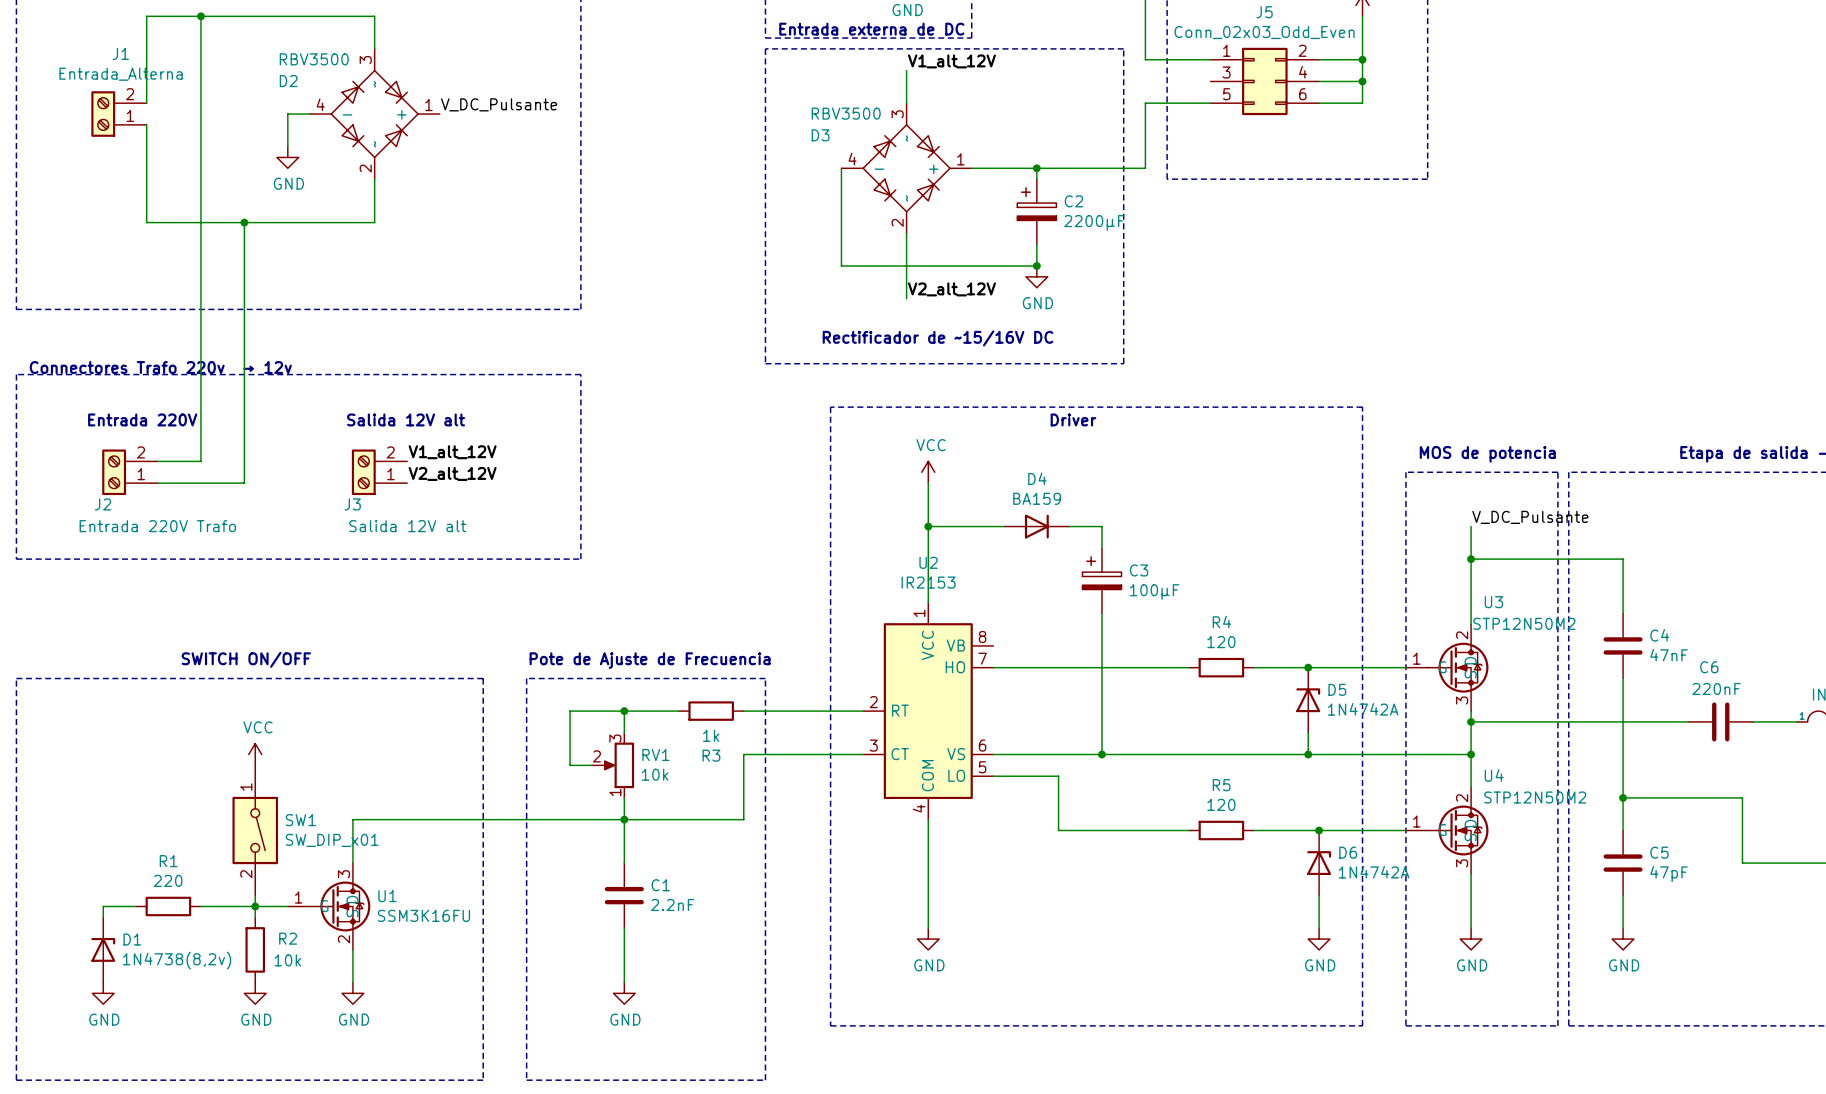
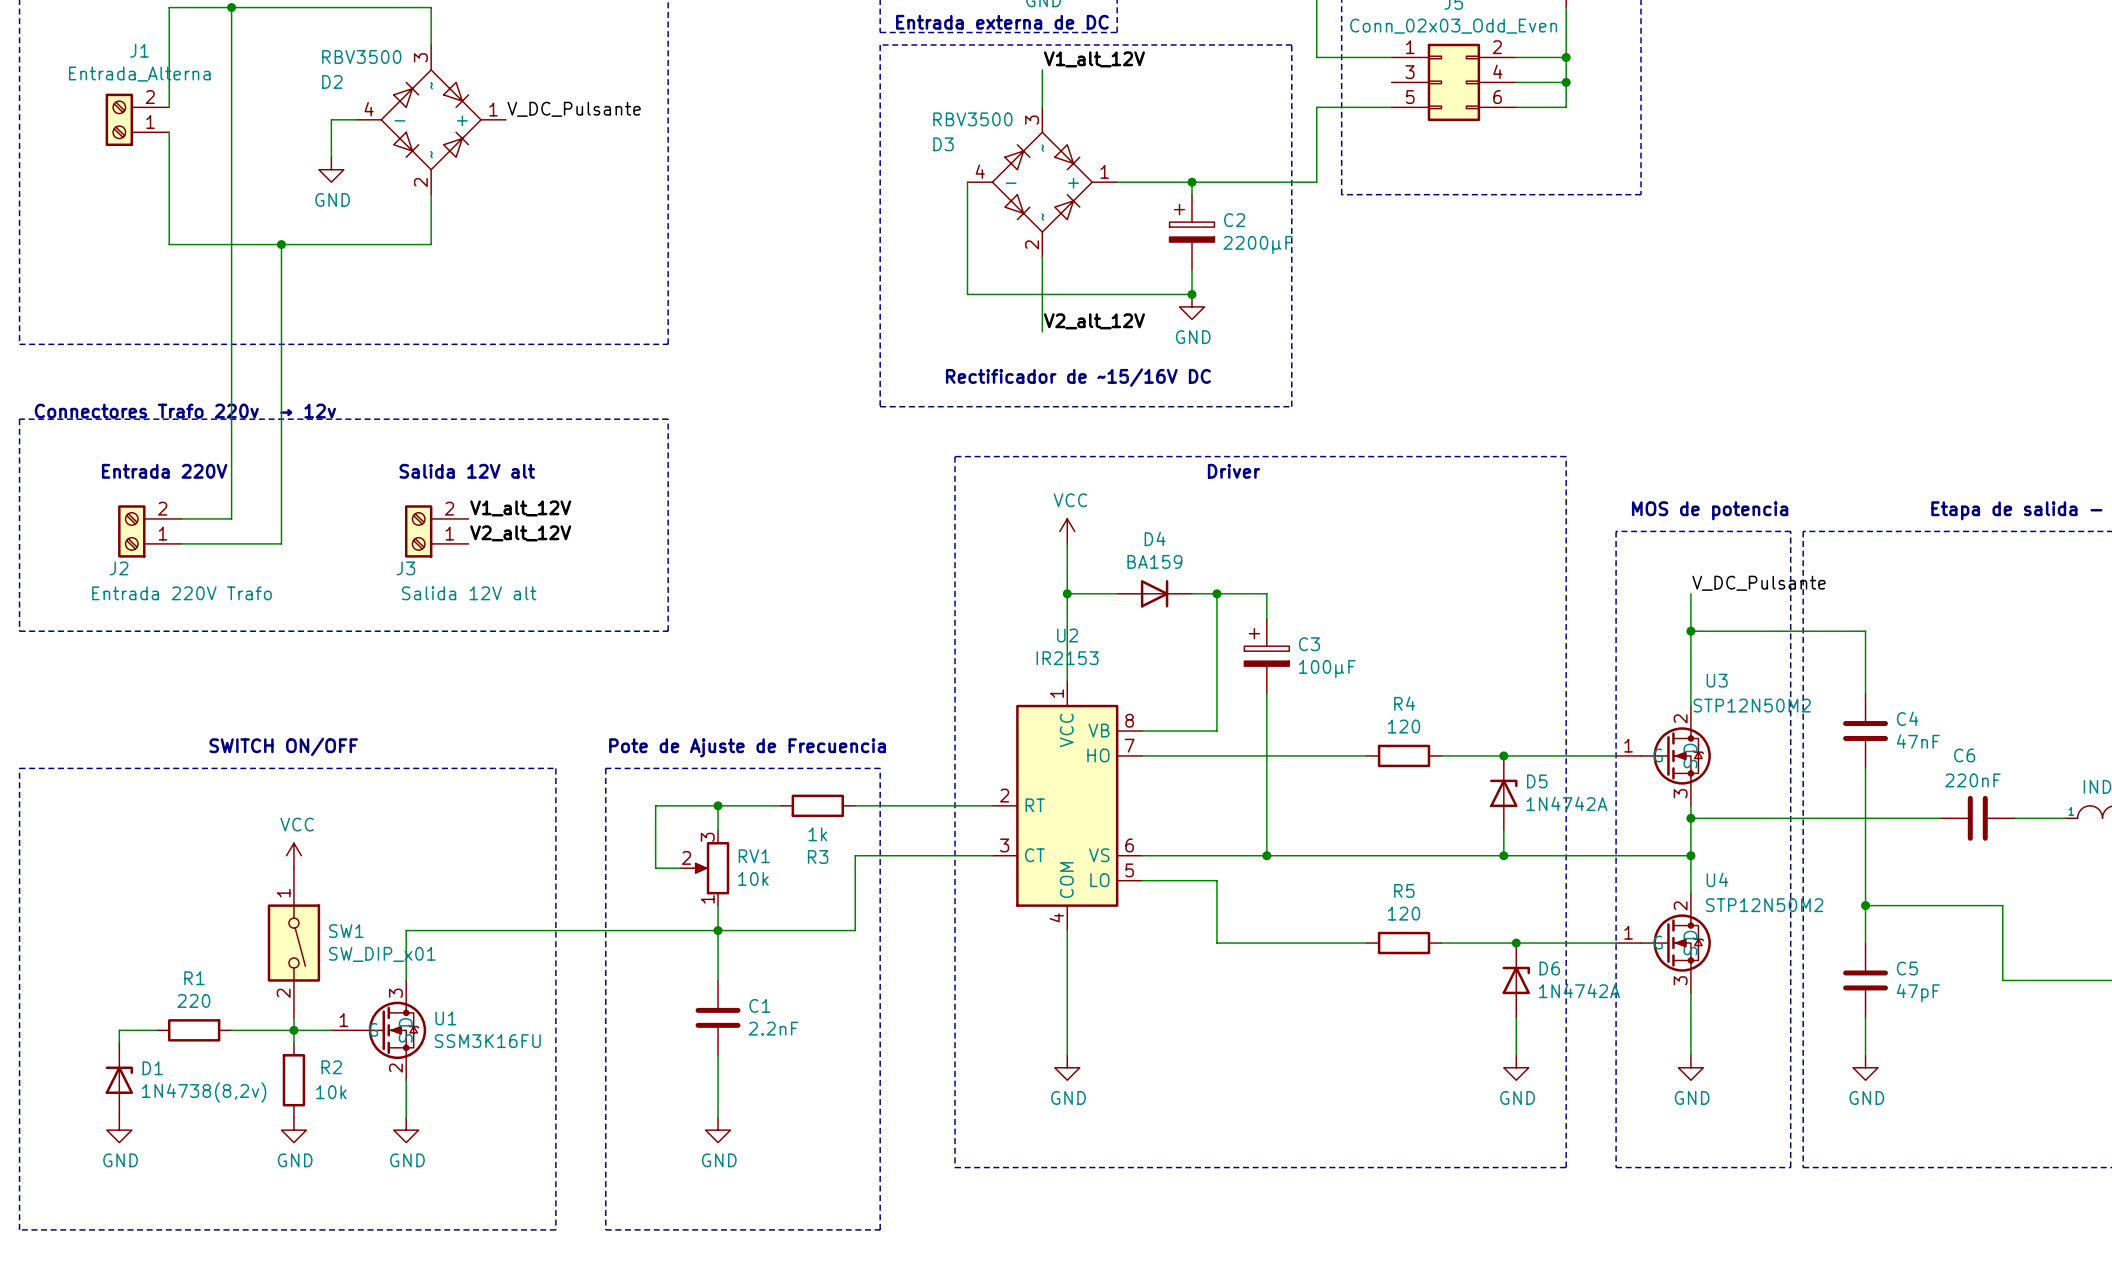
D4 position: (1036, 526) -> (1154, 593)
wire: none -> (1216, 593) (1216, 731) (1142, 731)
junction: none -> (1216, 593)

